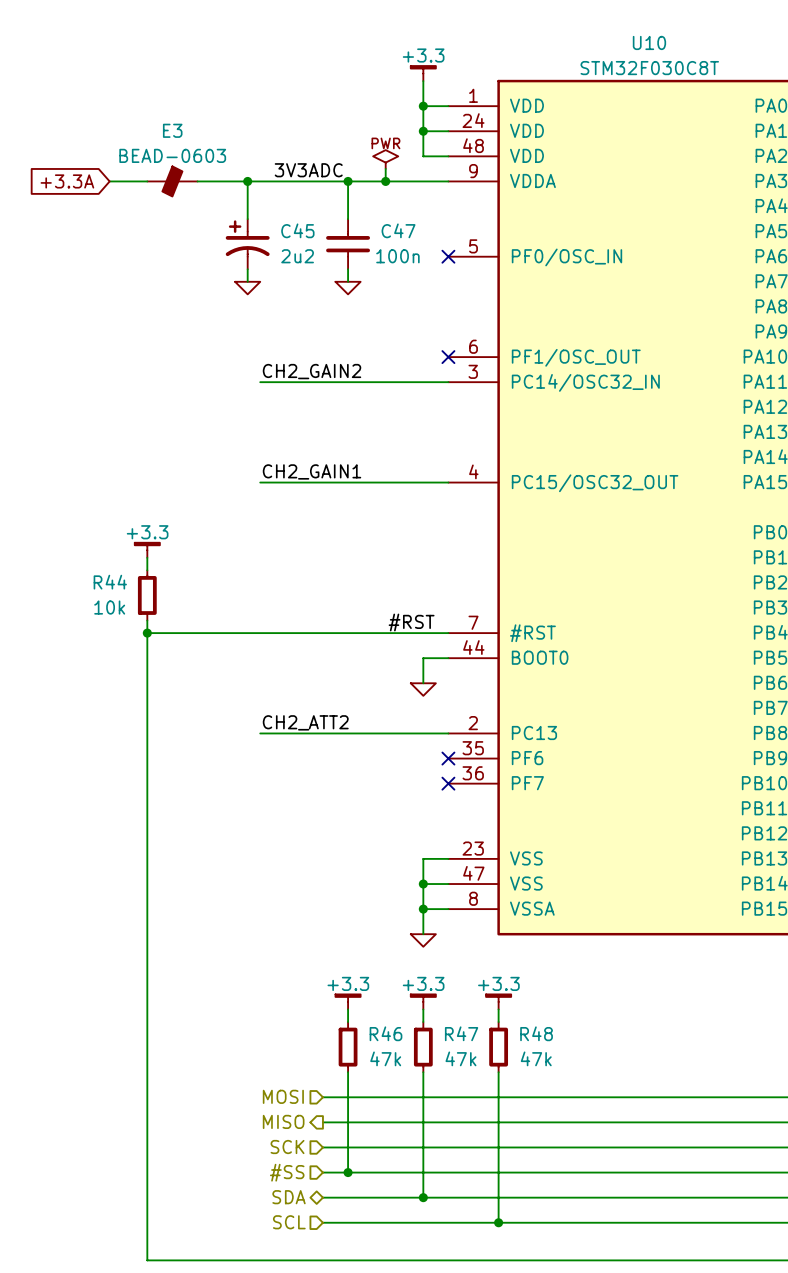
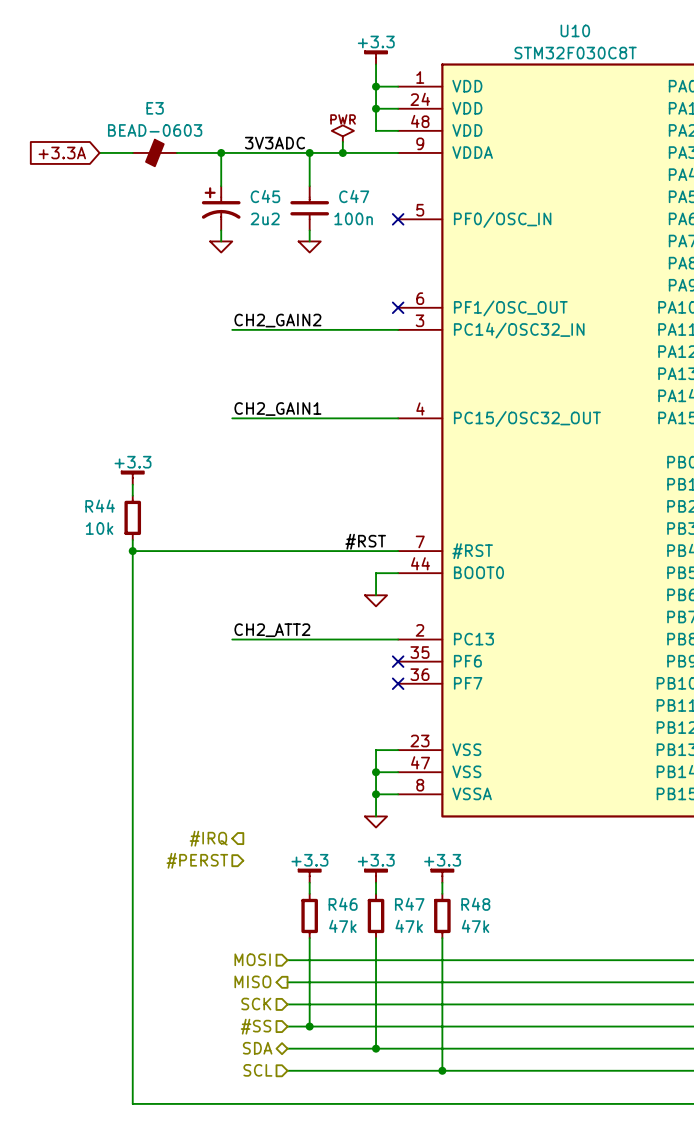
hierarchical label: none -> #IRQ (208, 838)
hierarchical label: none -> #PERST (197, 860)

